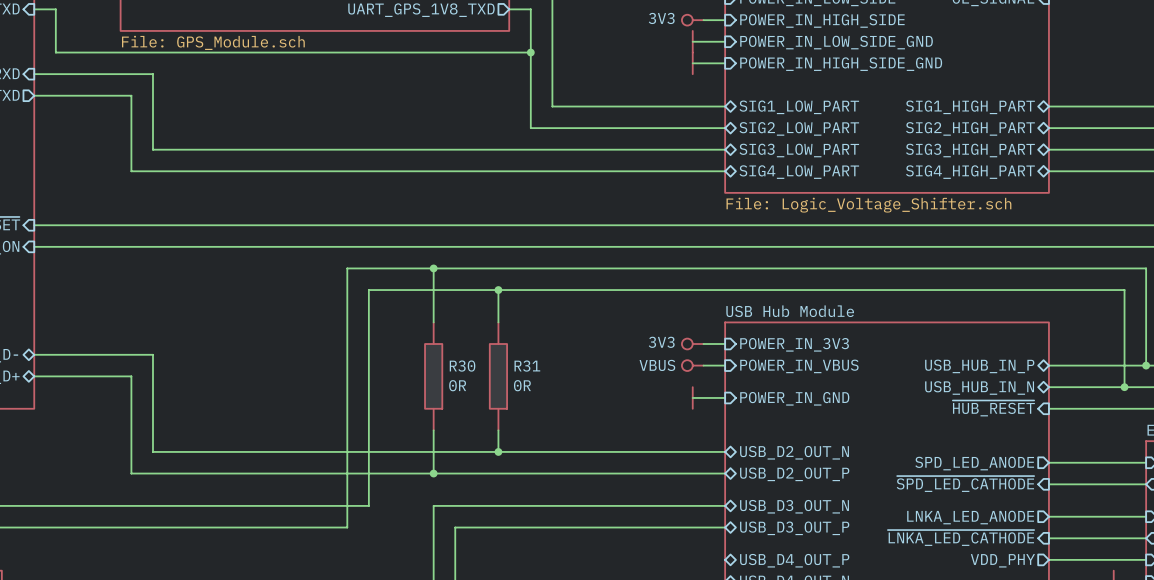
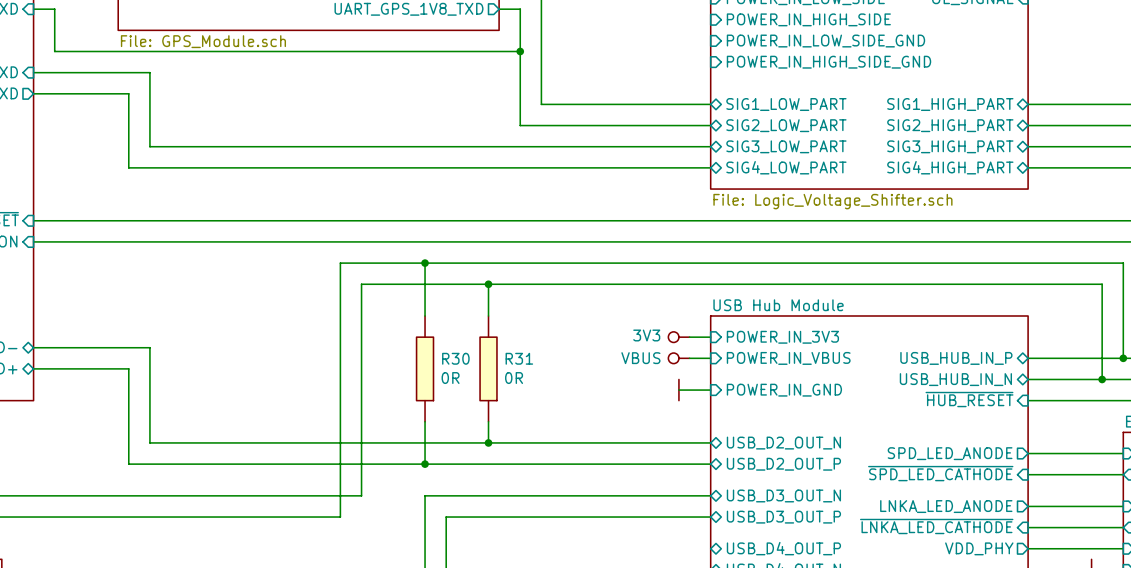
power symbol: 3V3 (692, 20) -> none
wire: (703, 20) (725, 20) -> none
wire: (692, 41) (725, 41) -> none
power symbol: (692, 41) -> none
wire: (692, 63) (725, 63) -> none
power symbol: (692, 63) -> none

